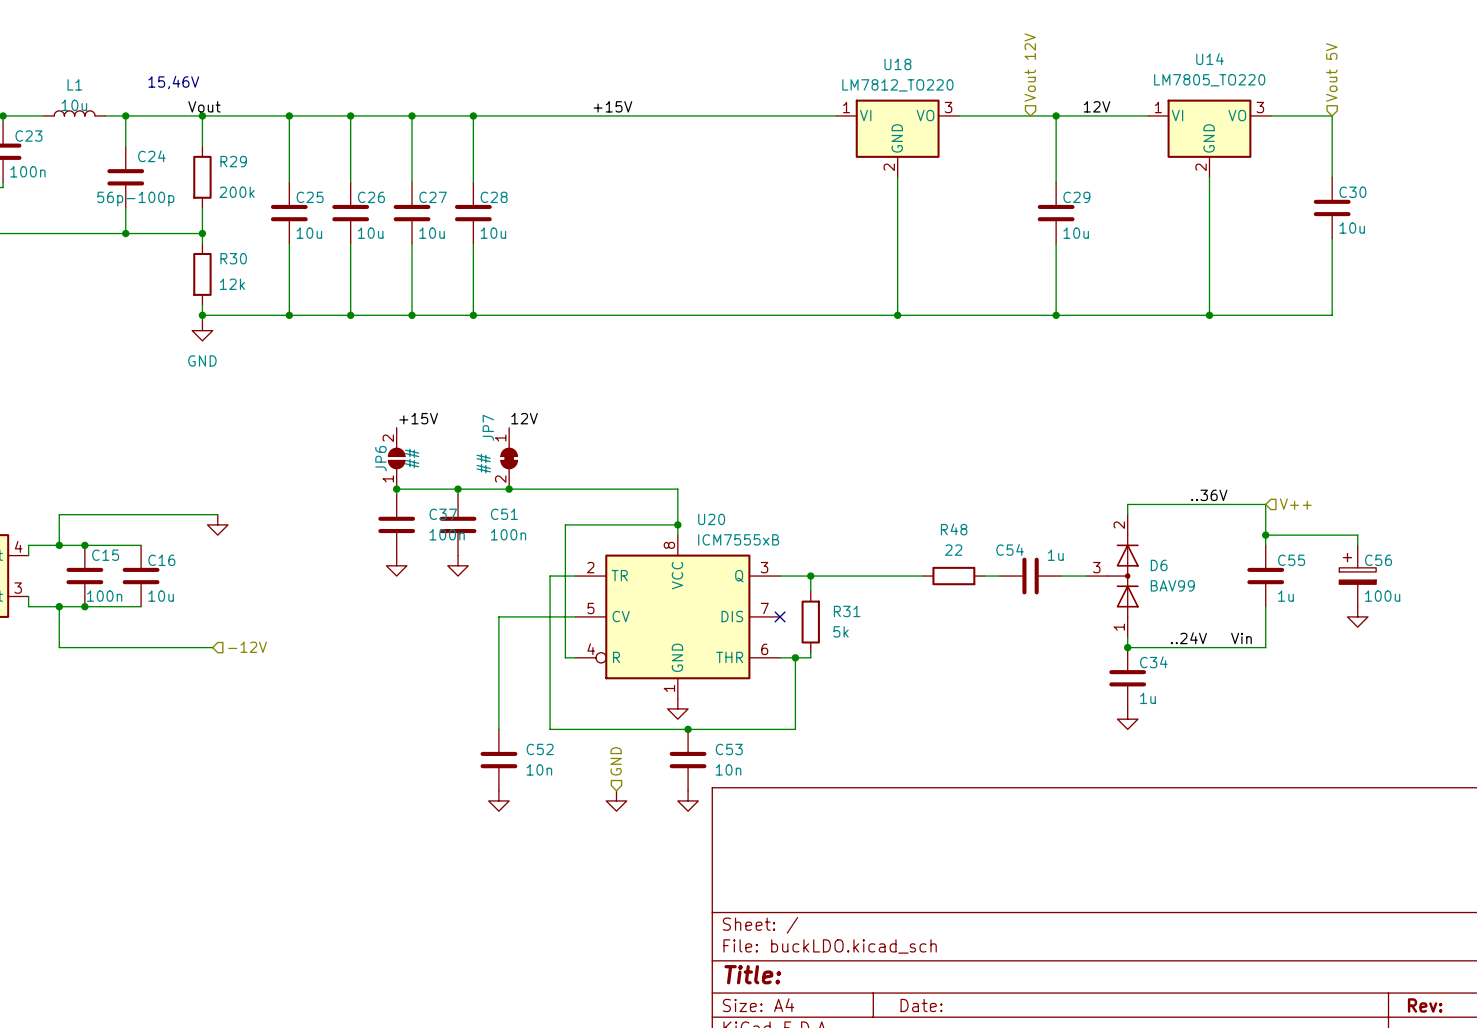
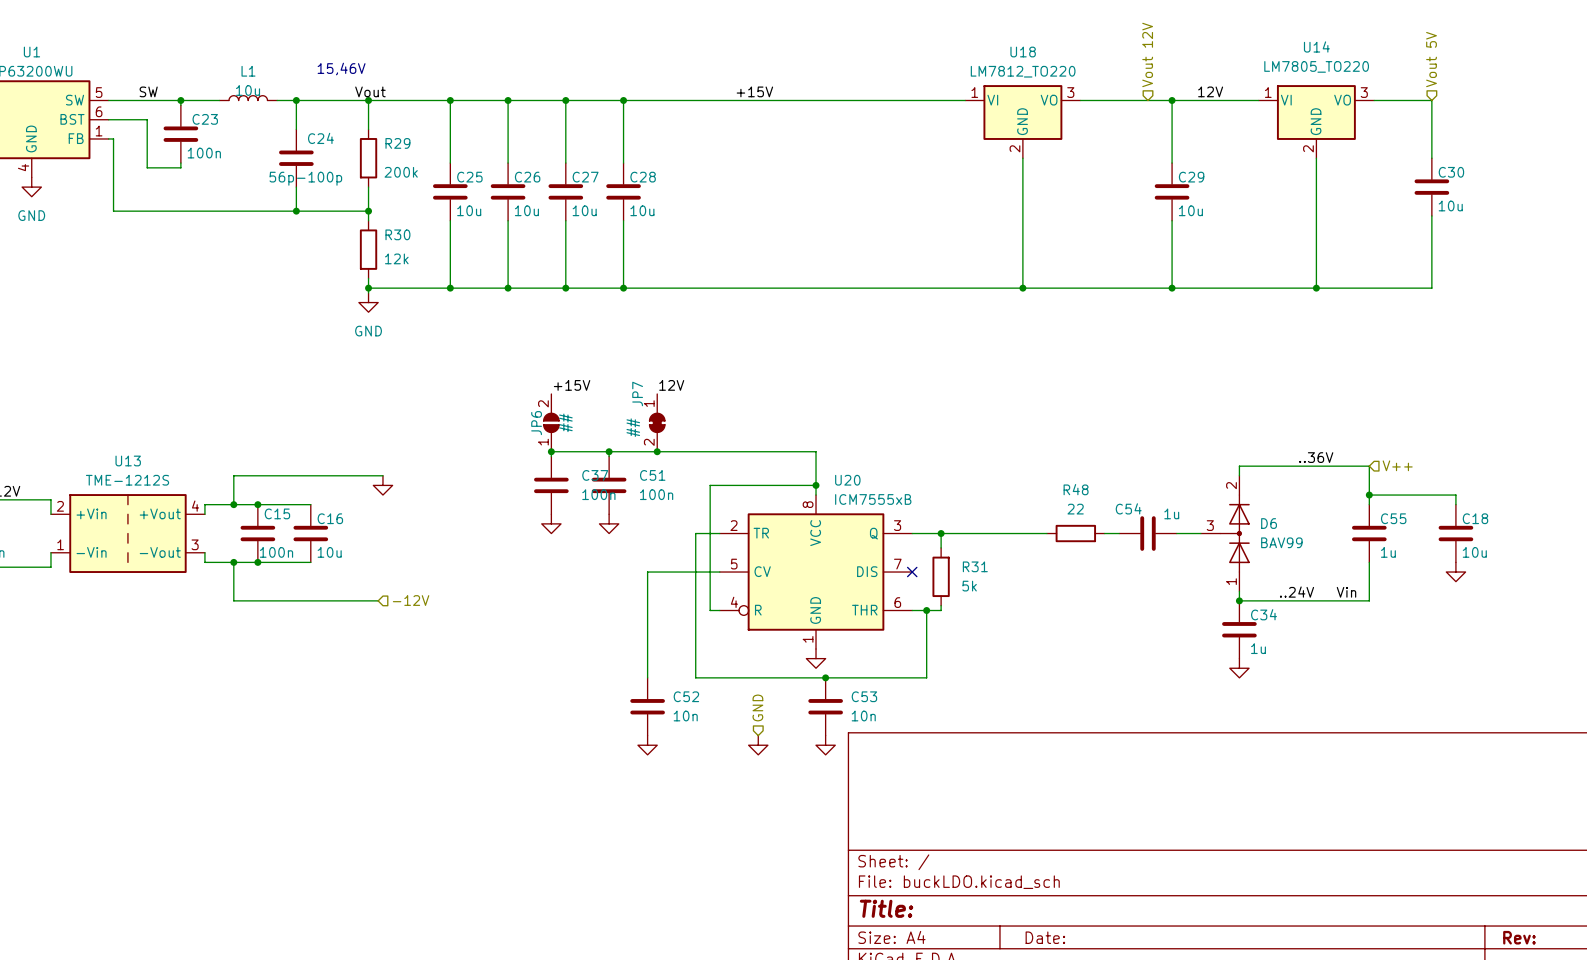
C56: 100u (1357, 576) -> none
C18: none -> 10u (1455, 533)

